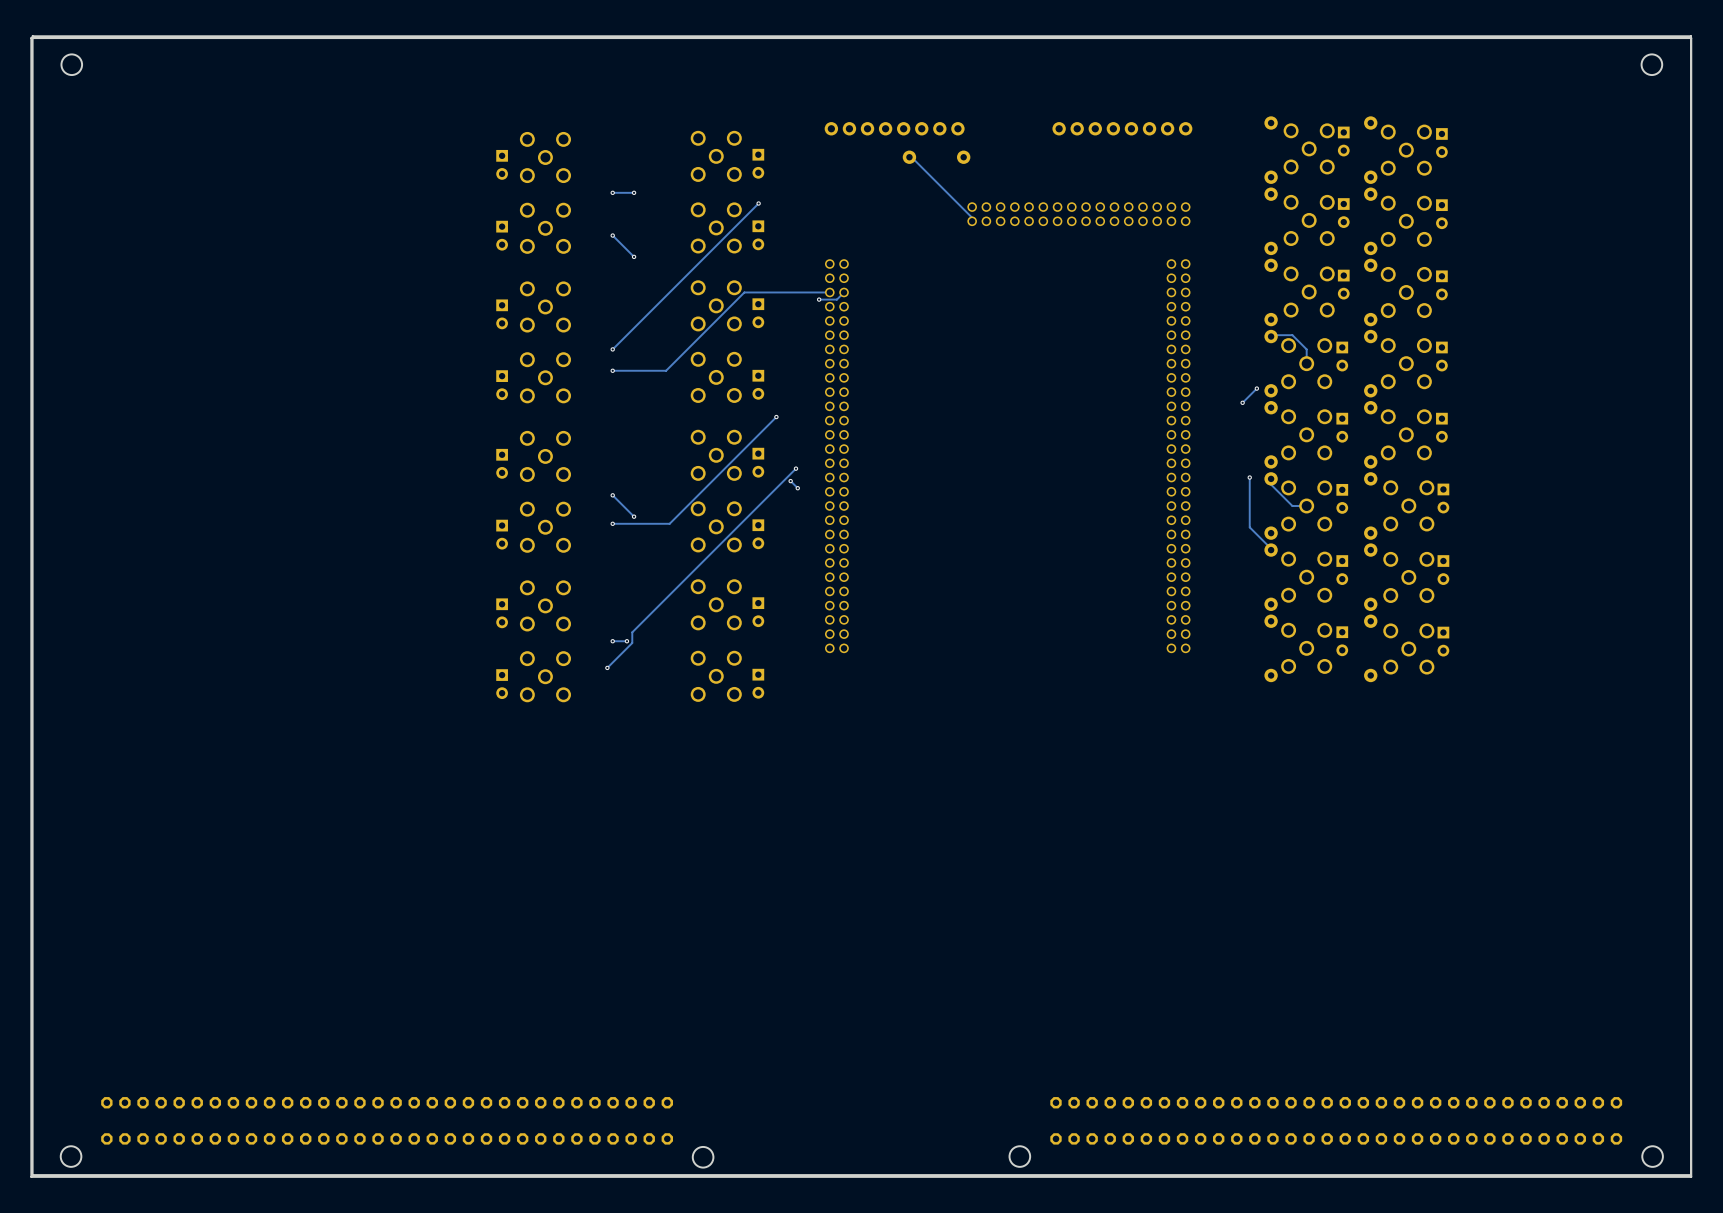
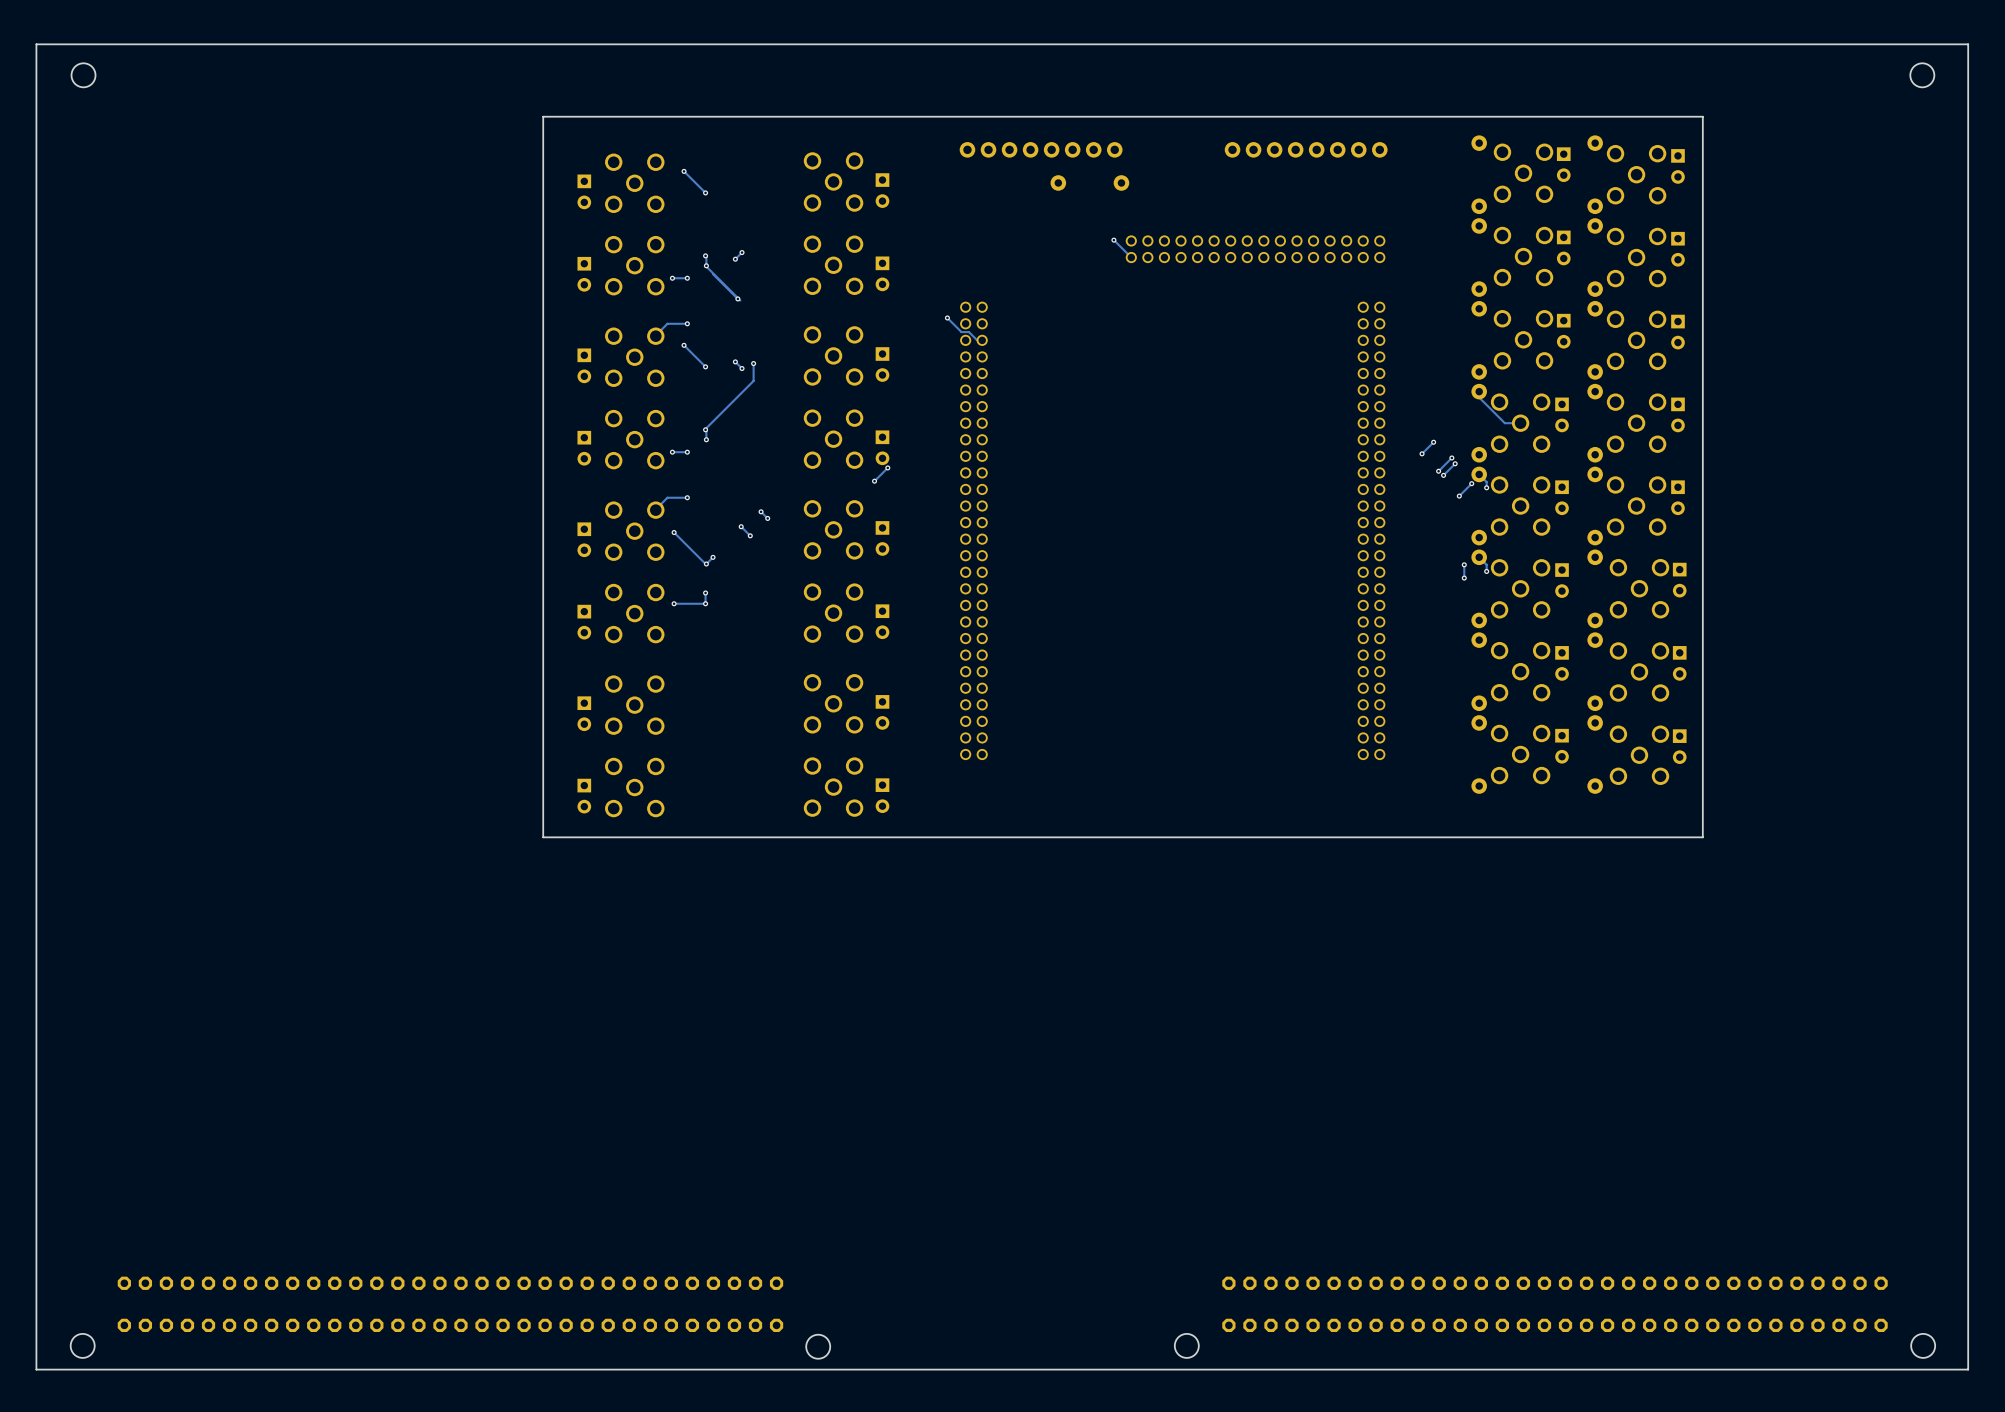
board edge: (1691, 36) (1691, 1175) (32, 1175) (32, 36) (1691, 36) -> none
board edge: none -> (1702, 116) (1702, 837) (543, 837) (543, 116) (1702, 116)
track: none -> (684, 171) (705, 192)
via: none -> (684, 171)
track: (909, 157) (911, 157) (972, 217) (972, 221) -> (1113, 240) (1131, 257)
via: none -> (705, 192)
via: (612, 192) -> none
track: (634, 192) (612, 192) -> none
via: (634, 192) -> none
track: (758, 203) (612, 349) -> none
via: (758, 203) -> none
via: none -> (1113, 240)
track: none -> (742, 252) (735, 259)
via: none -> (742, 252)
track: none -> (705, 255) (706, 266) (740, 300)
via: none -> (705, 255)
via: none -> (735, 259)
via: none -> (706, 265)
via: (612, 235) -> none
via: none -> (672, 278)
track: none -> (687, 278) (672, 278)
via: none -> (687, 278)
track: none -> (687, 323) (667, 323) (655, 336)
via: none -> (687, 323)
track: (829, 292) (744, 292) (666, 370) (612, 370) -> none
track: (844, 292) (836, 299) (819, 299) -> (982, 340) (977, 340) (968, 332) (961, 332) (947, 317)
track: none -> (684, 345) (705, 366)
via: none -> (684, 345)
via position: (819, 299) -> (947, 317)
track: none -> (735, 361) (742, 368)
via: none -> (735, 361)
track: none -> (753, 363) (753, 380) (705, 428) (706, 439)
via: none -> (753, 363)
via: none -> (705, 366)
via: none -> (742, 368)
track: (1271, 336) (1292, 335) (1306, 349) (1306, 363) -> (1479, 391) (1479, 397) (1504, 423) (1520, 423)
via: (612, 349) -> none
via: none -> (705, 429)
via: (612, 370) -> none
via: none -> (706, 439)
track: none -> (1433, 442) (1422, 453)
via: none -> (1433, 442)
via: none -> (672, 452)
track: none -> (687, 452) (672, 452)
via: none -> (687, 452)
track: (1256, 388) (1242, 402) -> none
via: (1256, 388) -> none
via: none -> (1422, 453)
track: none -> (1451, 457) (1438, 471)
via: none -> (1451, 457)
track: none -> (1455, 463) (1443, 475)
via: none -> (1455, 463)
track: none -> (887, 467) (874, 481)
via: none -> (887, 467)
via: (1242, 402) -> none
via: none -> (1438, 471)
track: none -> (1479, 474) (1486, 482) (1486, 487)
via: none -> (1443, 475)
via: none -> (874, 481)
track: none -> (1471, 483) (1459, 496)
via: none -> (1471, 483)
track: (776, 417) (669, 523) (612, 523) -> none
via: (776, 417) -> none
via: none -> (1486, 487)
via: none -> (1459, 496)
track: none -> (687, 497) (667, 497) (655, 510)
via: none -> (687, 497)
track: none -> (761, 511) (767, 518)
via: none -> (761, 511)
via: none -> (767, 518)
track: none -> (741, 526) (750, 535)
via: none -> (741, 526)
track: none -> (674, 532) (705, 564) (713, 557)
via: none -> (674, 532)
via: none -> (750, 535)
track: (795, 468) (632, 632) (632, 643) (607, 667) -> none
via: (795, 468) -> none
track: (1249, 477) (1249, 527) (1271, 550) -> none
via: (1249, 477) -> none
via: none -> (713, 557)
track: (1271, 478) (1271, 484) (1292, 506) (1306, 506) -> (1479, 557) (1486, 564) (1486, 571)
track: (790, 481) (797, 488) -> none
via: (790, 481) -> none
via: none -> (706, 564)
track: none -> (1464, 564) (1464, 578)
via: none -> (1464, 564)
via: (797, 488) -> none
via: none -> (1486, 571)
track: (612, 495) (634, 516) -> none
via: (612, 495) -> none
via: none -> (1464, 578)
track: none -> (705, 592) (705, 603) (674, 603)
via: none -> (705, 592)
via: (634, 516) -> none
via: none -> (674, 603)
via: none -> (705, 603)
via: (612, 523) -> none
via: (612, 641) -> none
track: (626, 641) (612, 641) -> none
via: (626, 641) -> none
via: (607, 667) -> none

